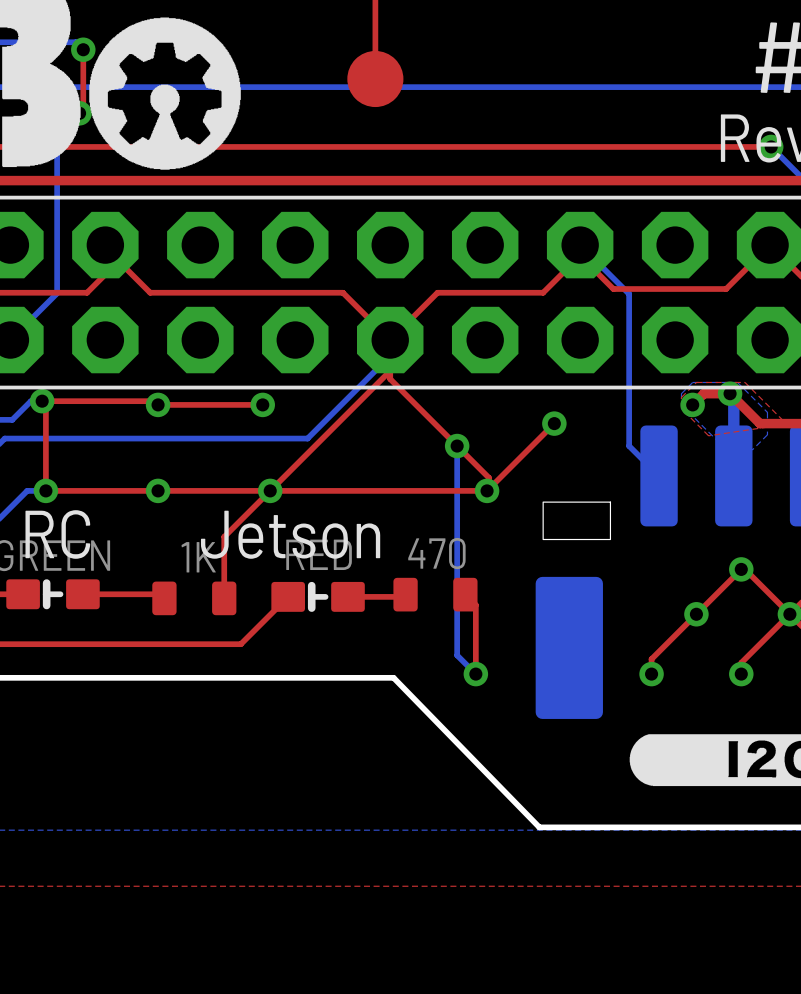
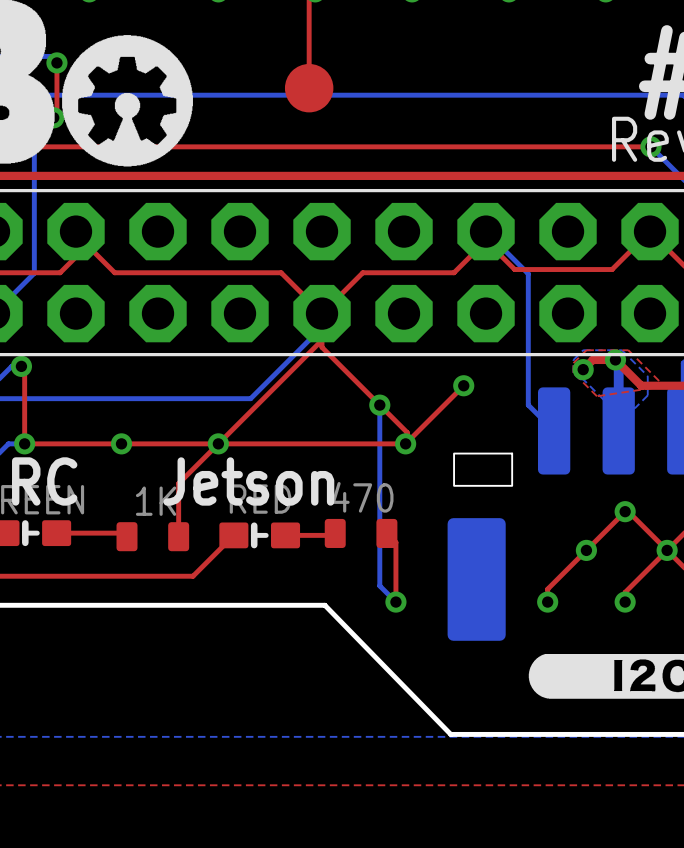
top track: (42, 401) (154, 401) (158, 404) (262, 404) -> none
via: (158, 404) -> none
via: (262, 404) -> none

